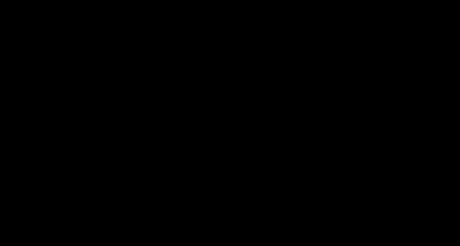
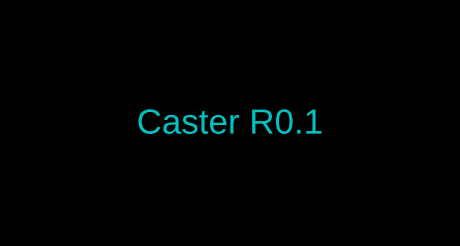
text: none -> Caster R0.1 (229, 121)

